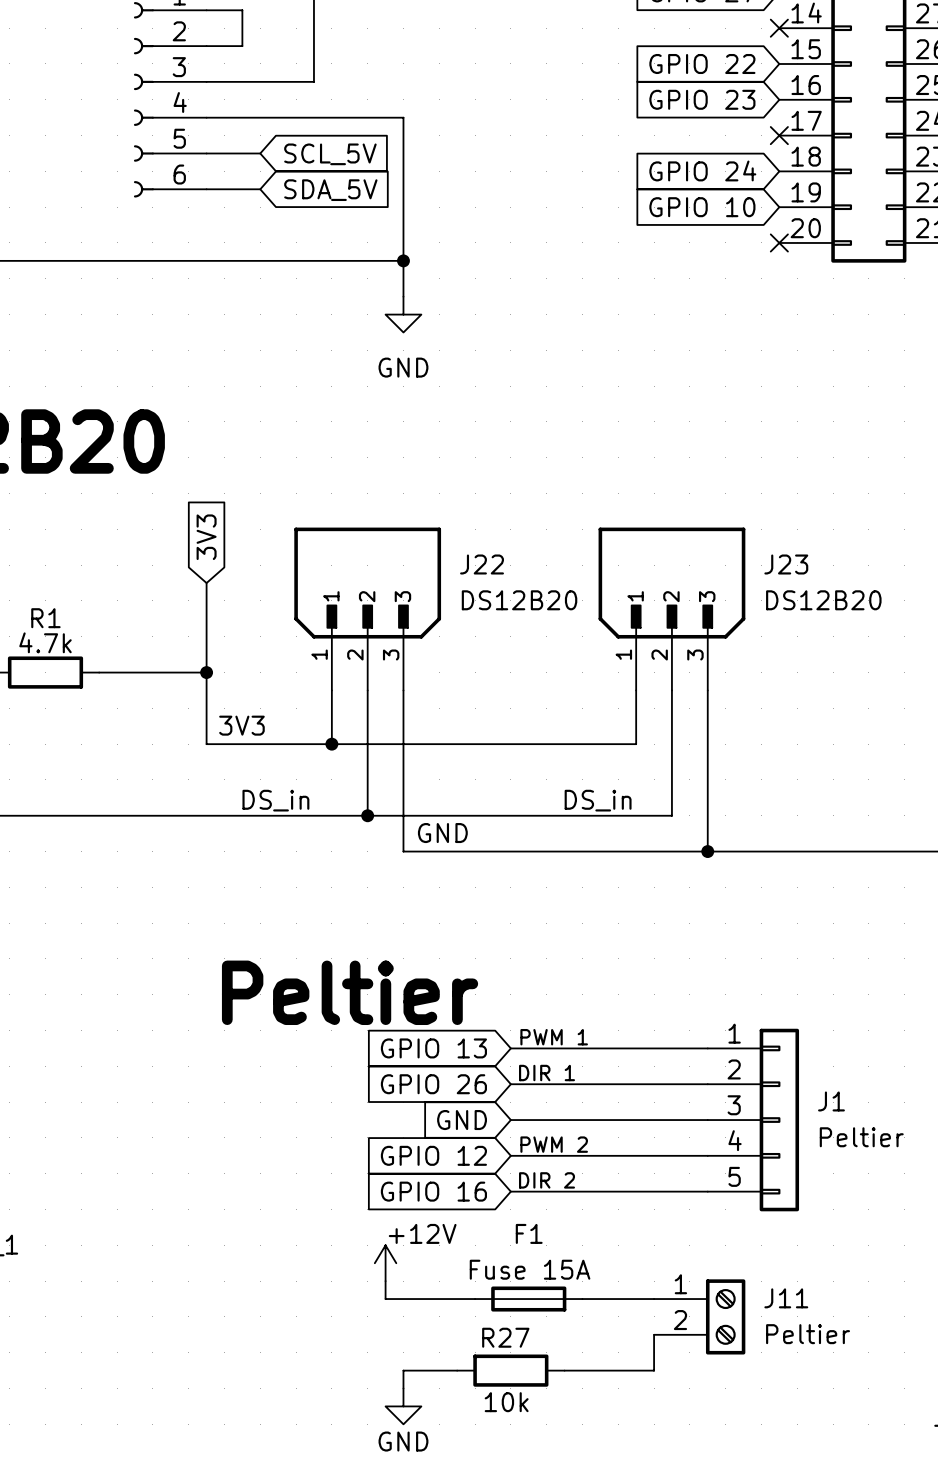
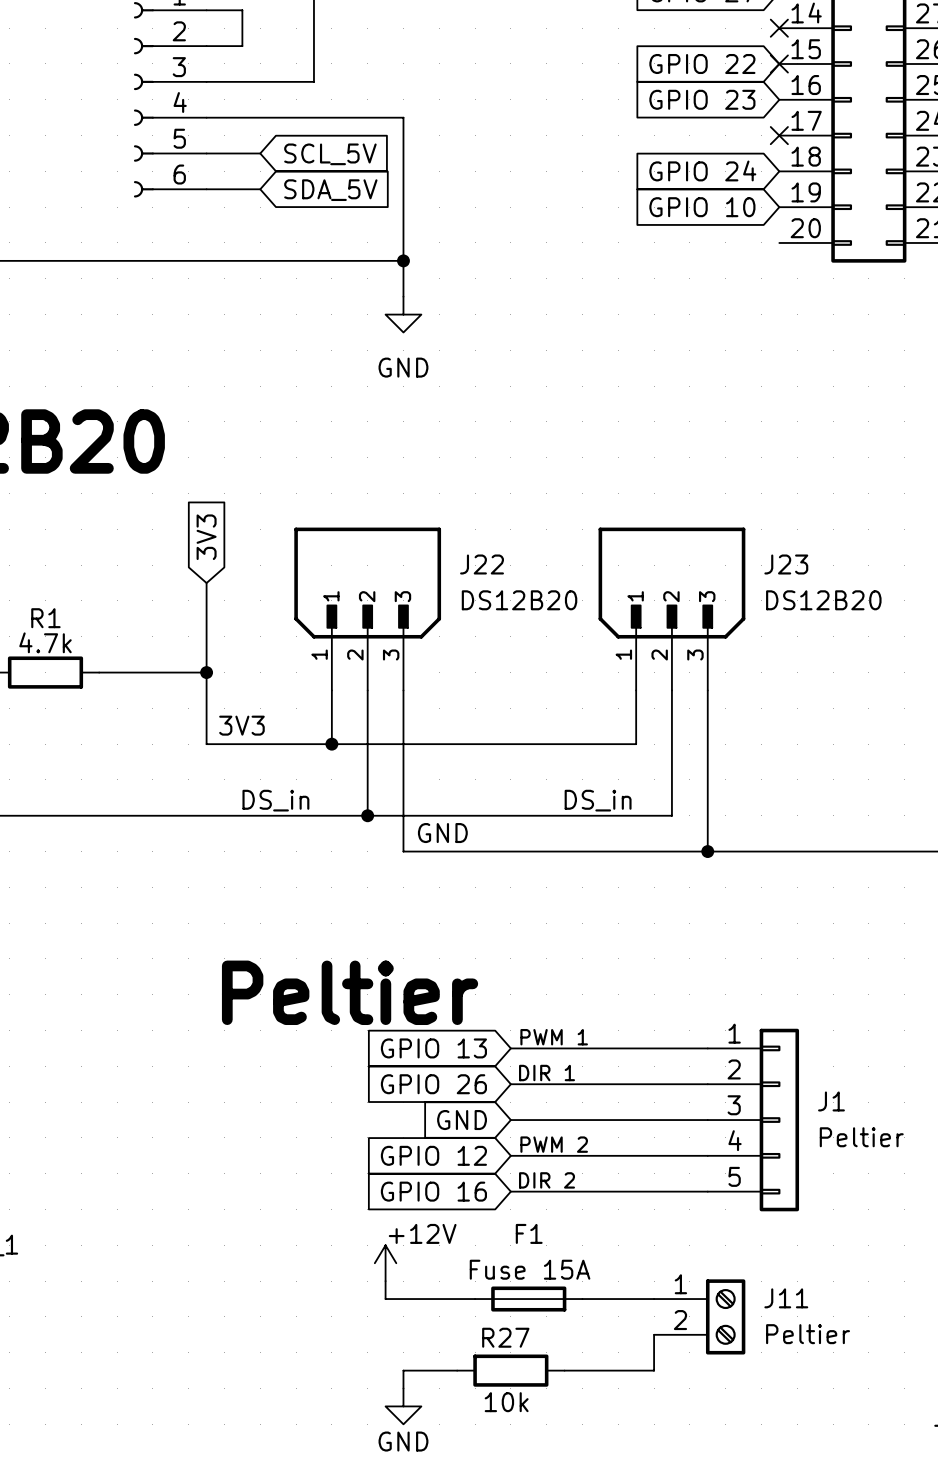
no-connect mark: none -> (779, 63)
no-connect mark: (779, 242) -> none

